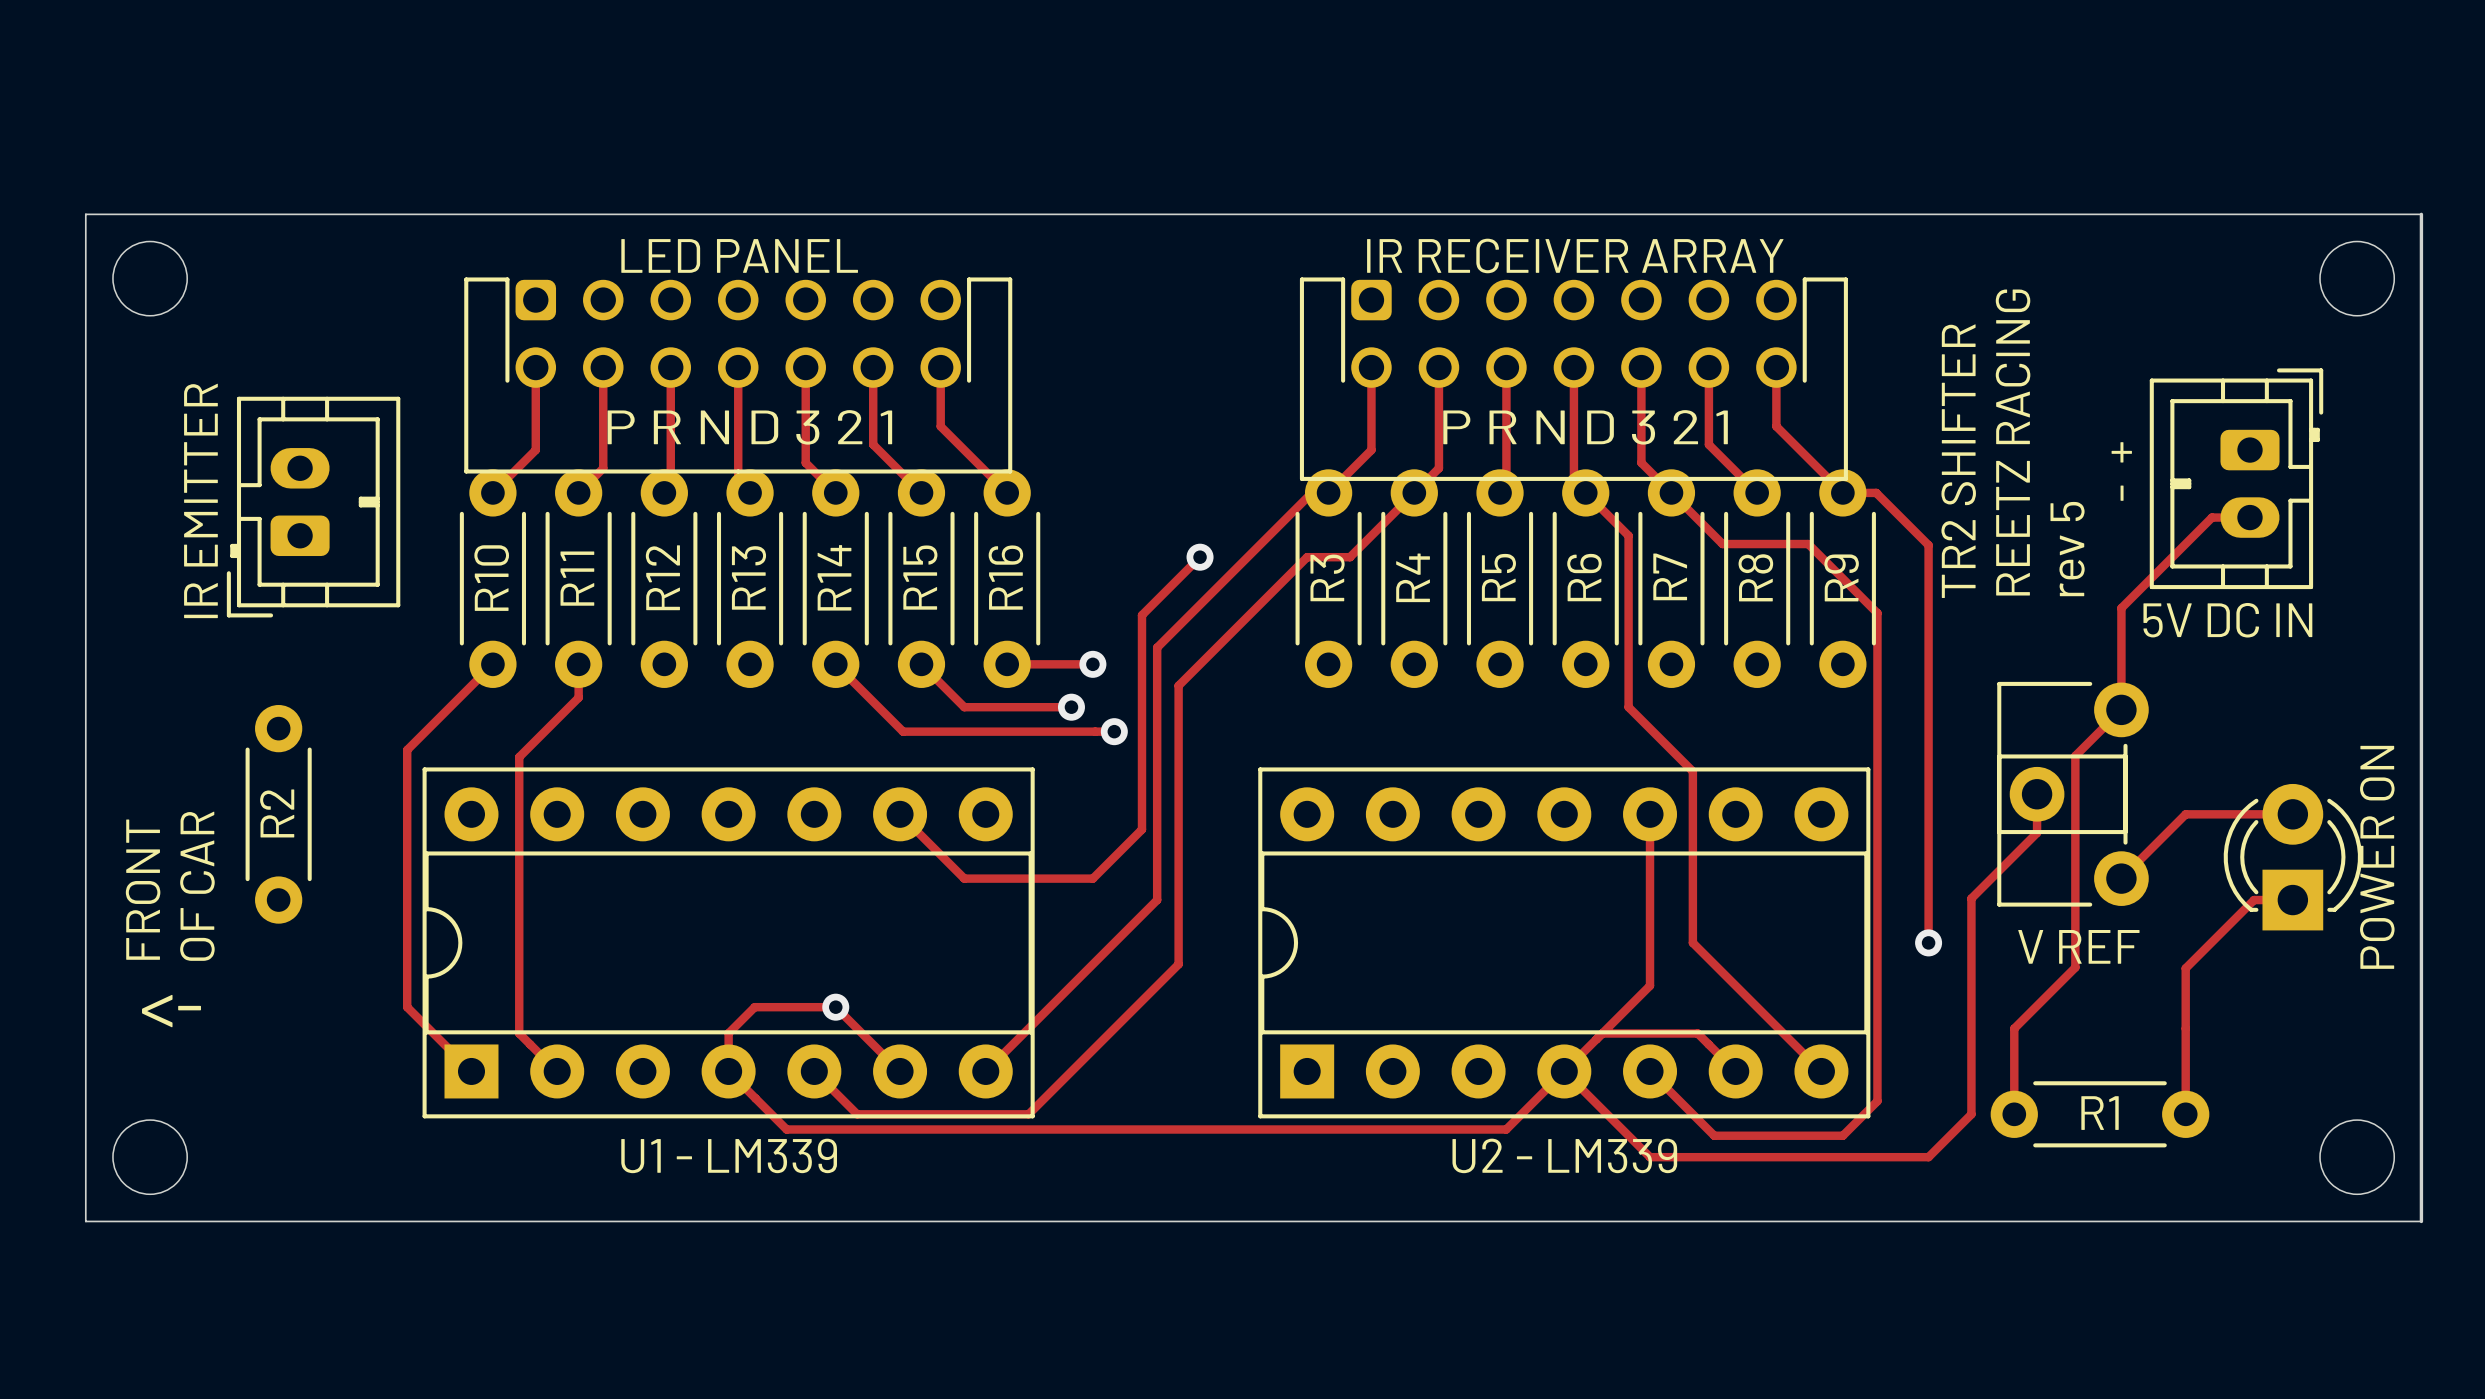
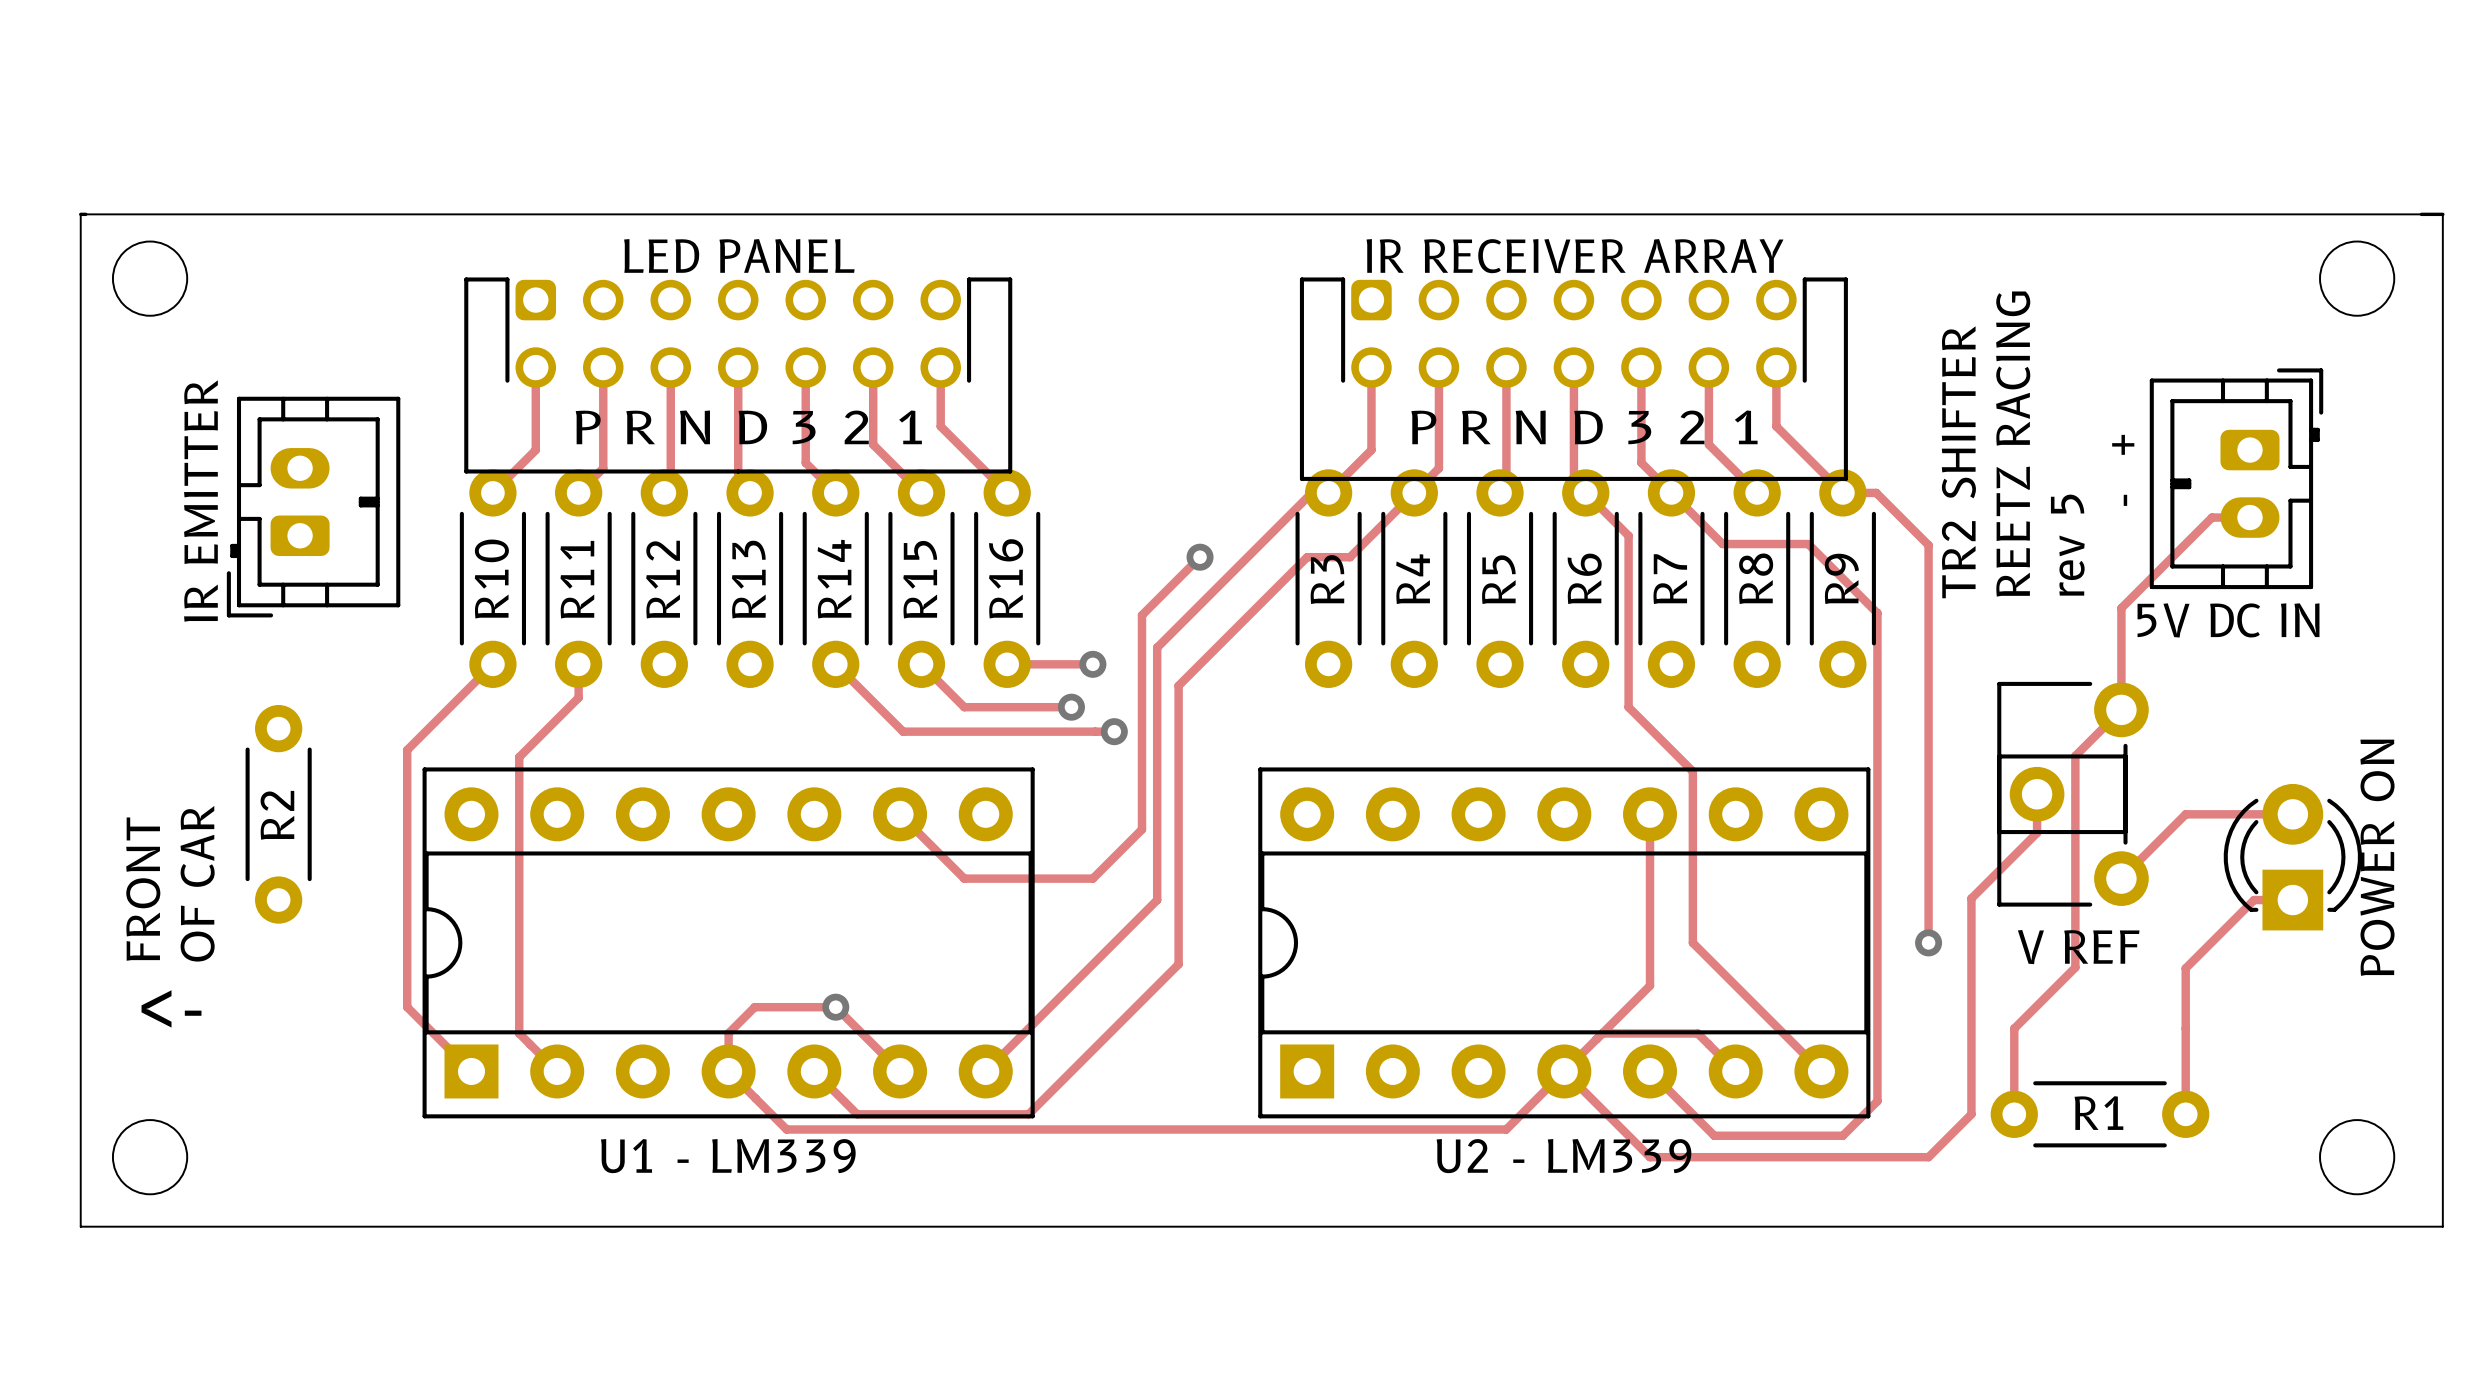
board edge: (85, 214) (85, 1221) (2421, 1221) (2421, 214) -> (85, 214) (80, 214) (80, 1226) (2442, 1226) (2442, 214) (2421, 214)

